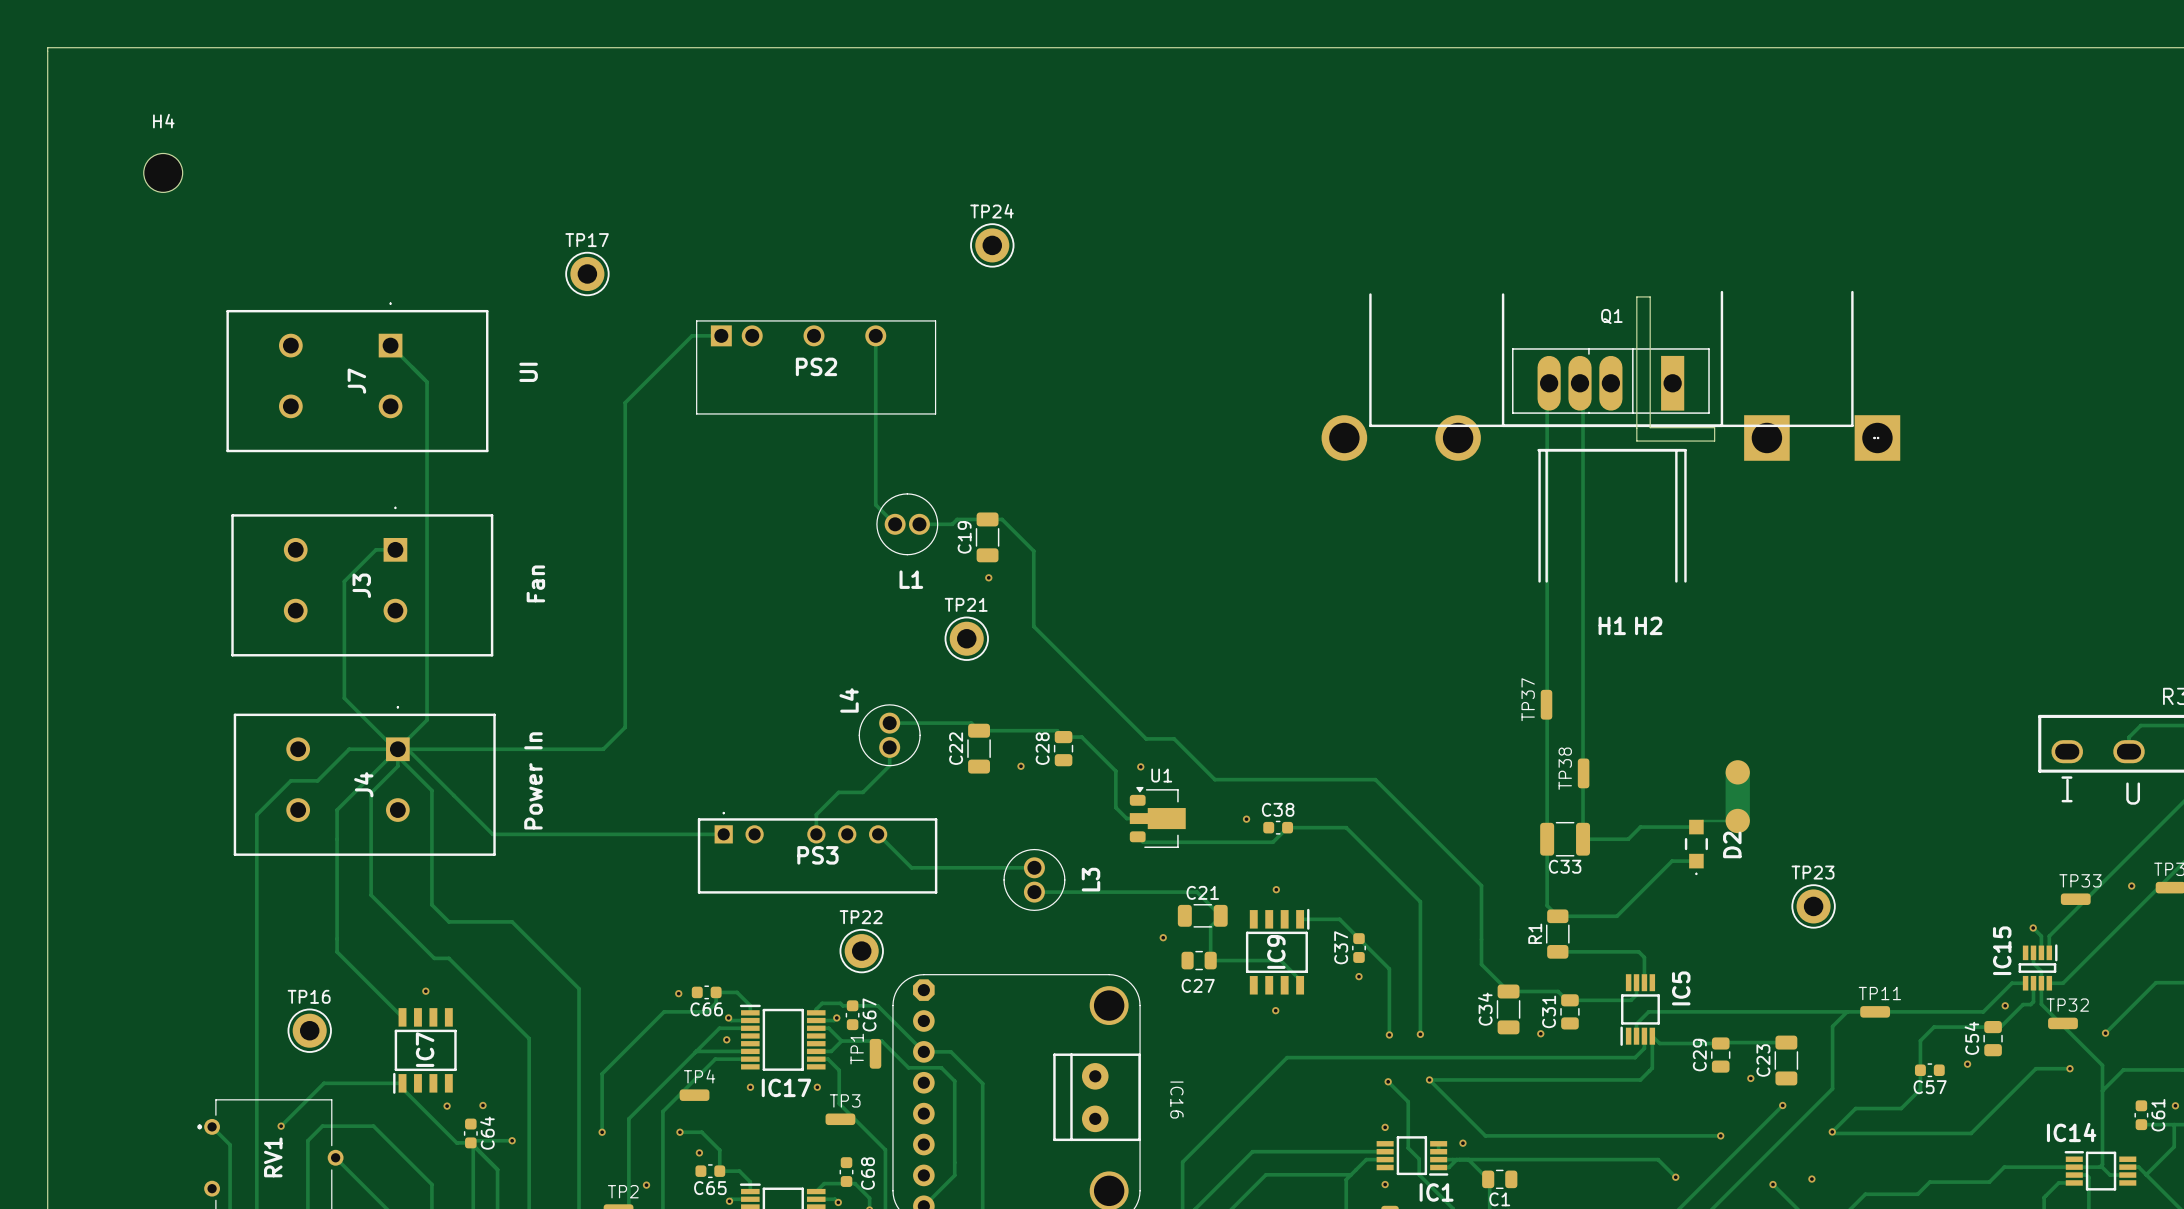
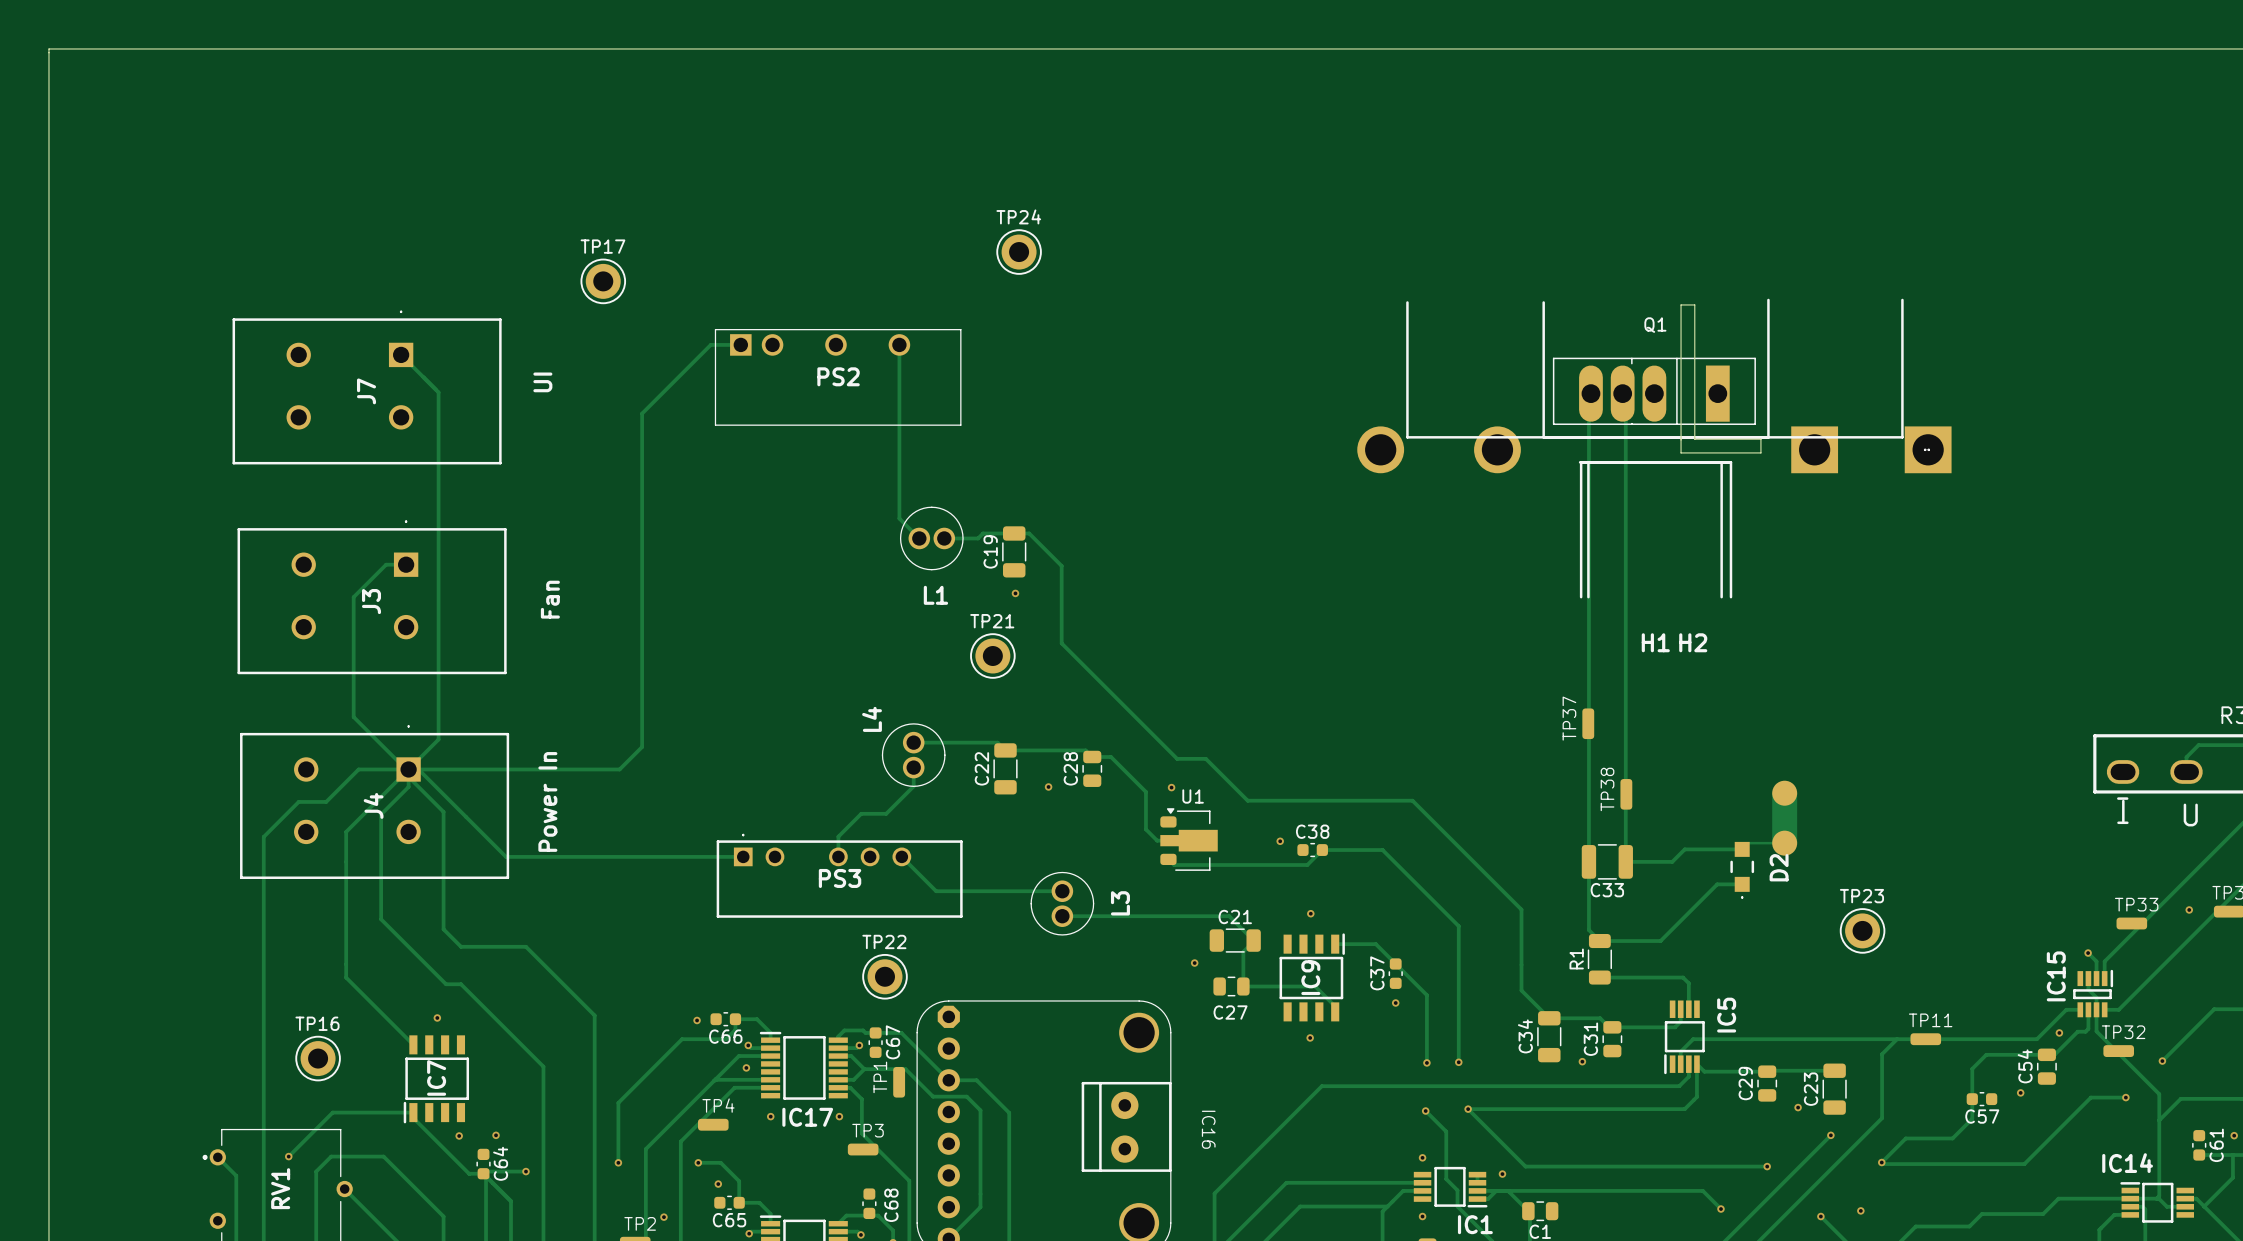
H4: (163, 172) -> none

